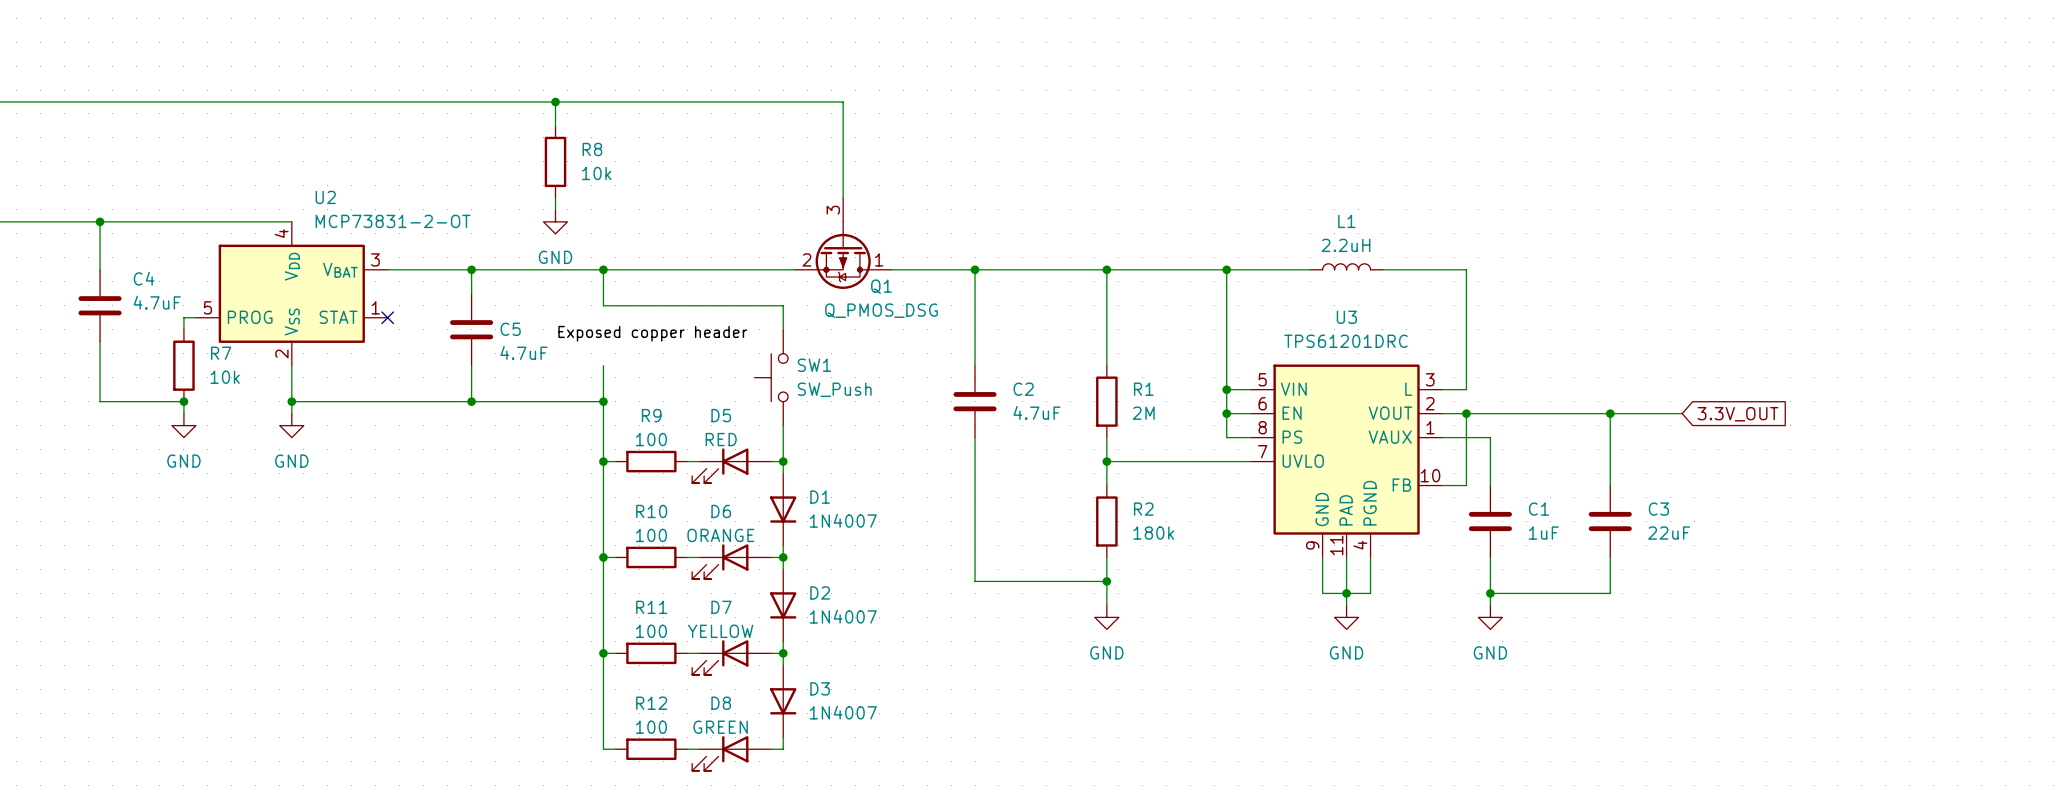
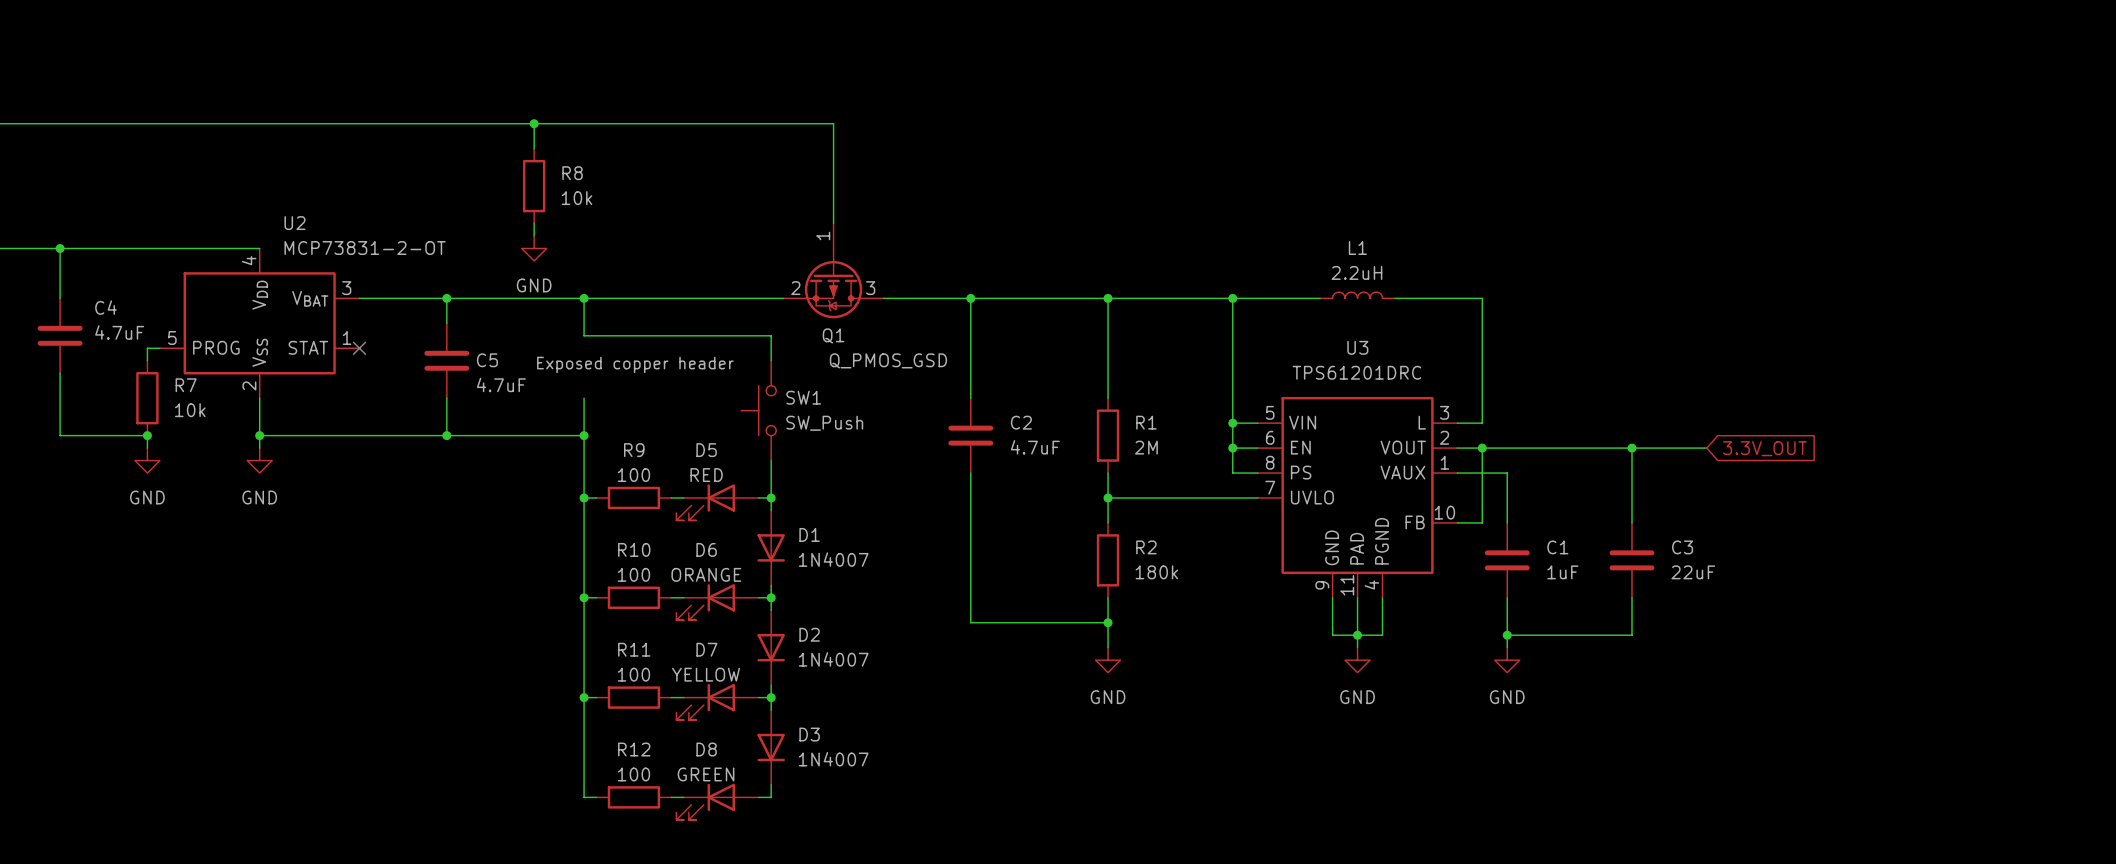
Q1 pin number: 3 (833, 210) -> 1 (823, 236)
Q1 pin number: 1 (879, 259) -> 3 (870, 288)
Q1 name position: Q1 (881, 286) -> Q1 (833, 335)
Q1 value: Q_PMOS_DSG (881, 310) -> Q_PMOS_GSD (888, 360)

